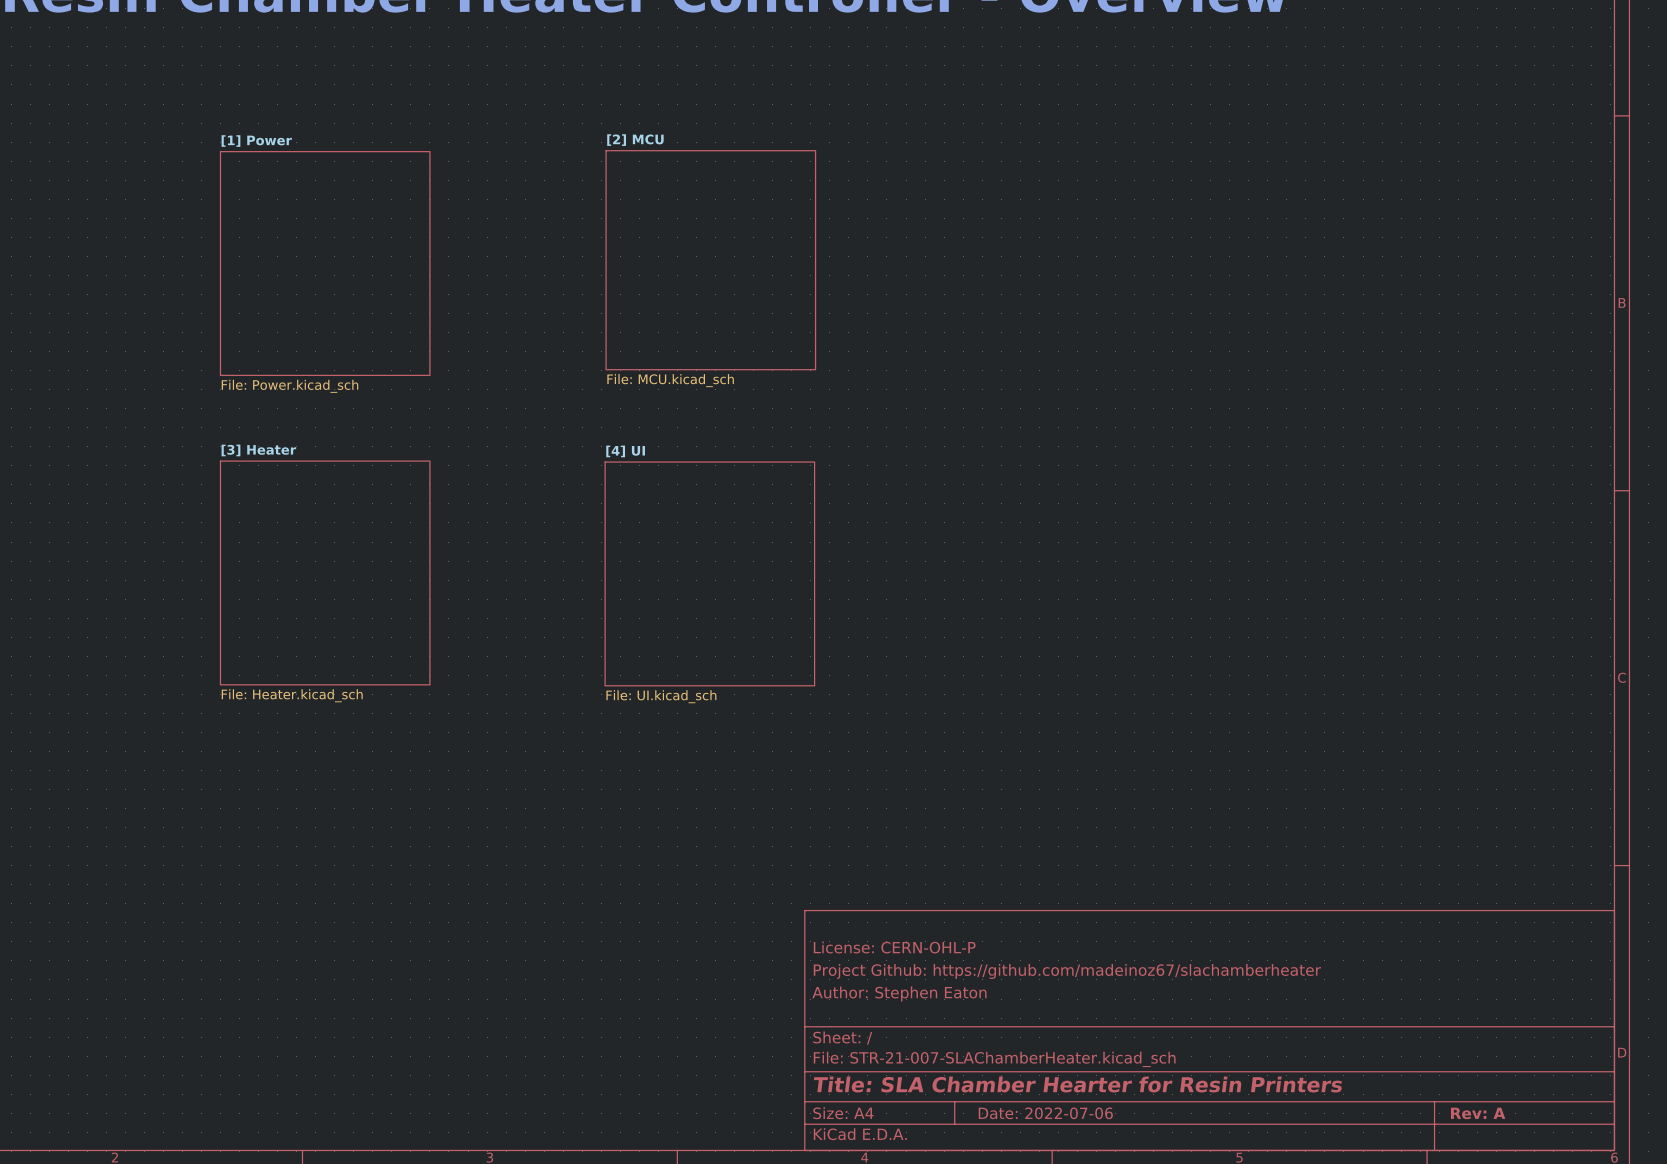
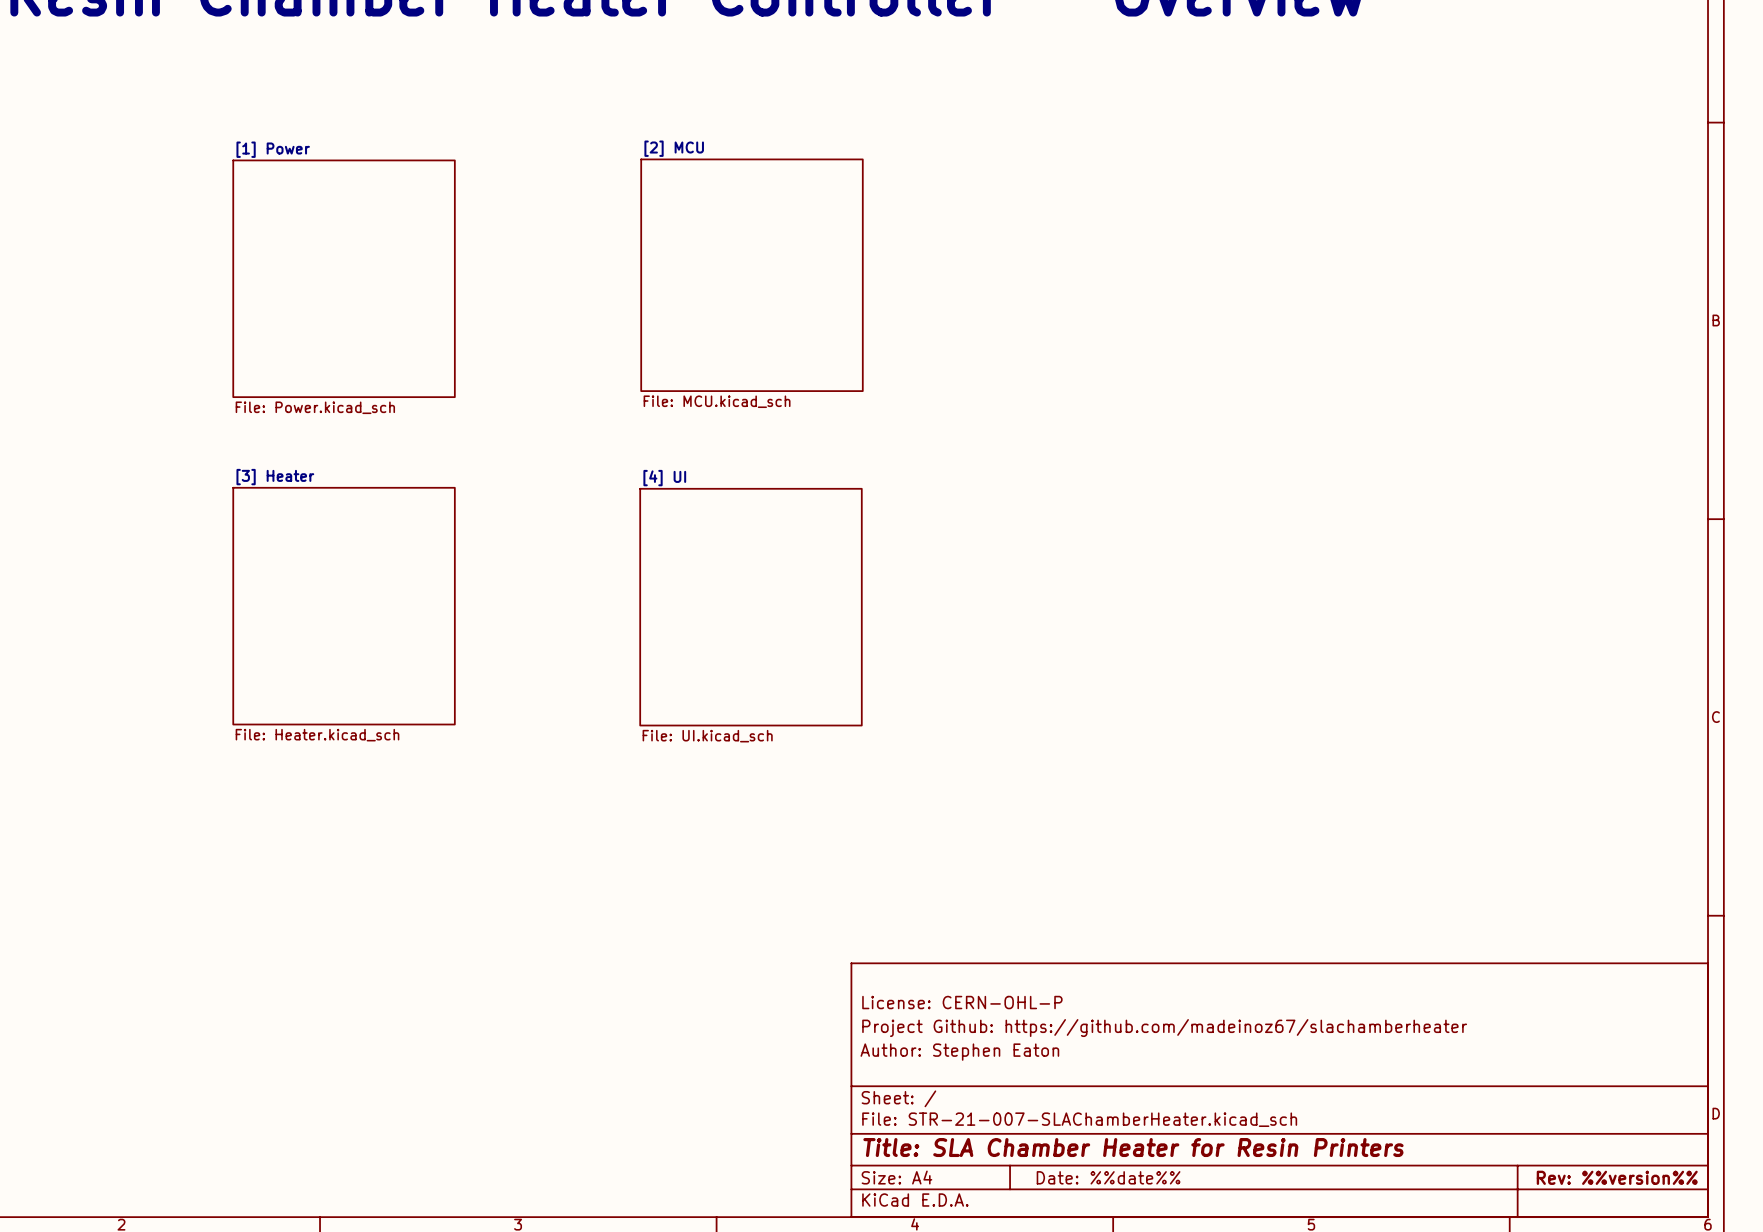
title block: Title: SLA Chamber Hearter for Resin Printers (1077, 1084) -> Title: SLA Chamber Heater for Resin Printers (1133, 1147)
title block: Date: 2022-07-06 (1045, 1113) -> Date: %%date%% (1108, 1177)
title block: Rev: A (1478, 1113) -> Rev: %%version%% (1617, 1177)

